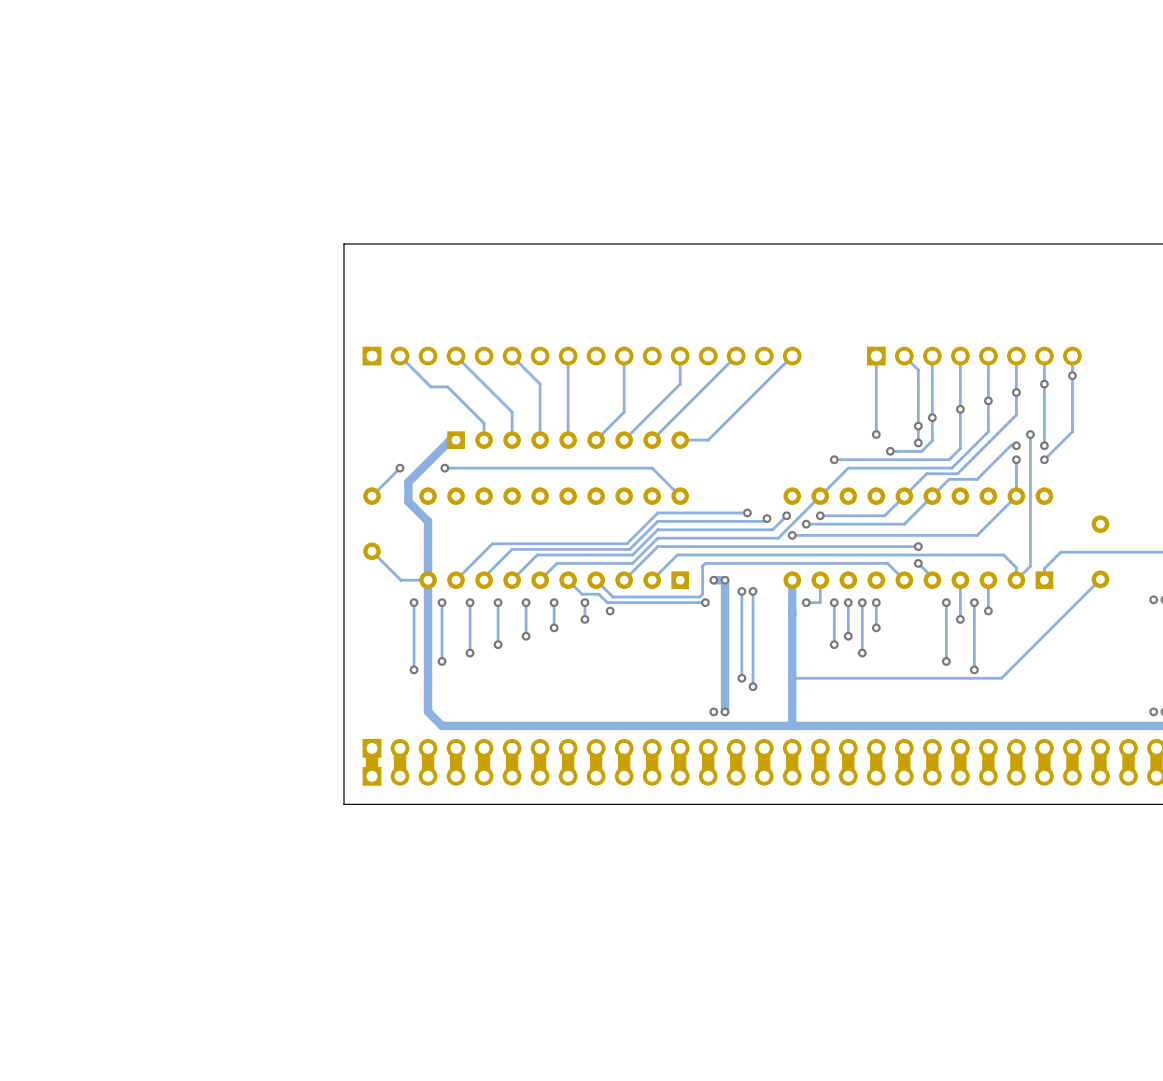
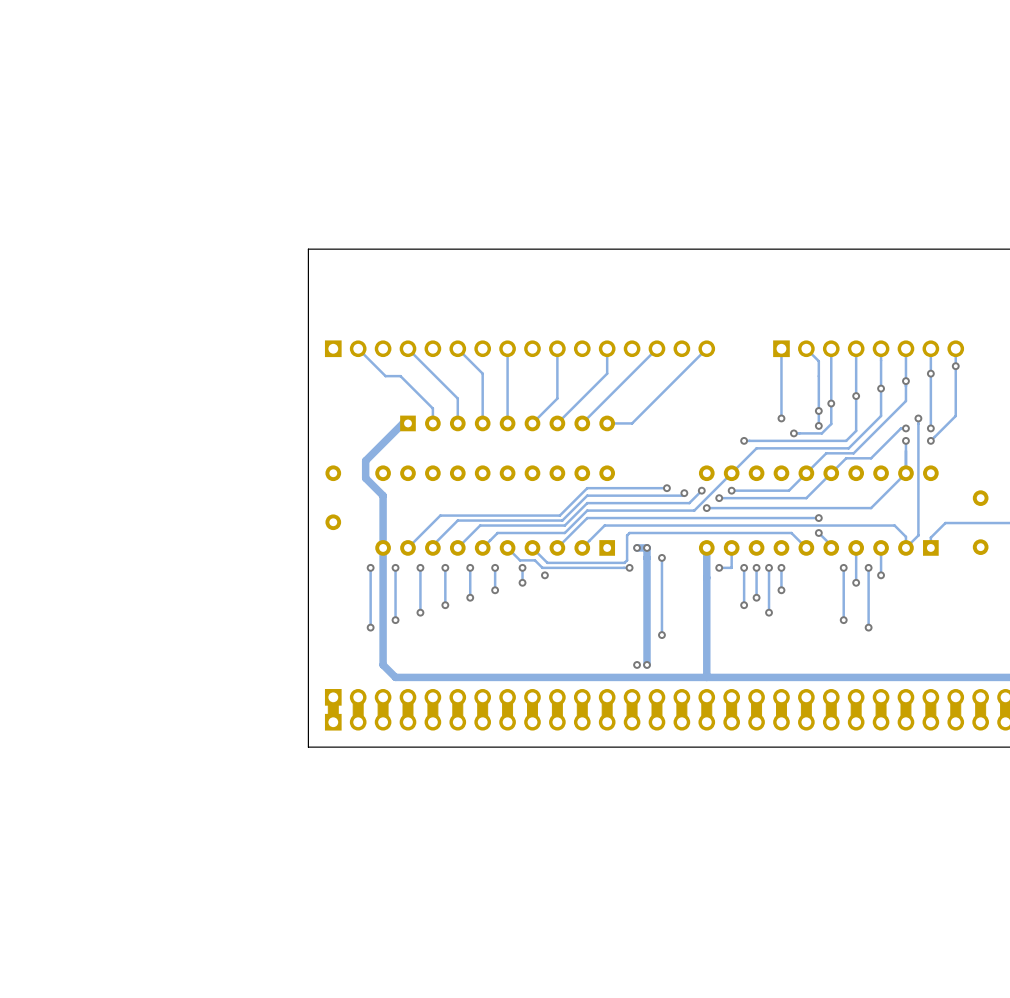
track: (400, 468) (372, 496) -> none
via: (400, 468) -> none
track: (444, 468) (652, 468) (680, 496) -> none
via: (444, 468) -> none
track: (372, 551) (400, 580) (428, 580) -> none
track: (1100, 579) (1001, 678) (792, 678) -> none
track: (753, 591) (753, 686) -> none
via: (753, 591) -> none
via: (753, 686) -> none

